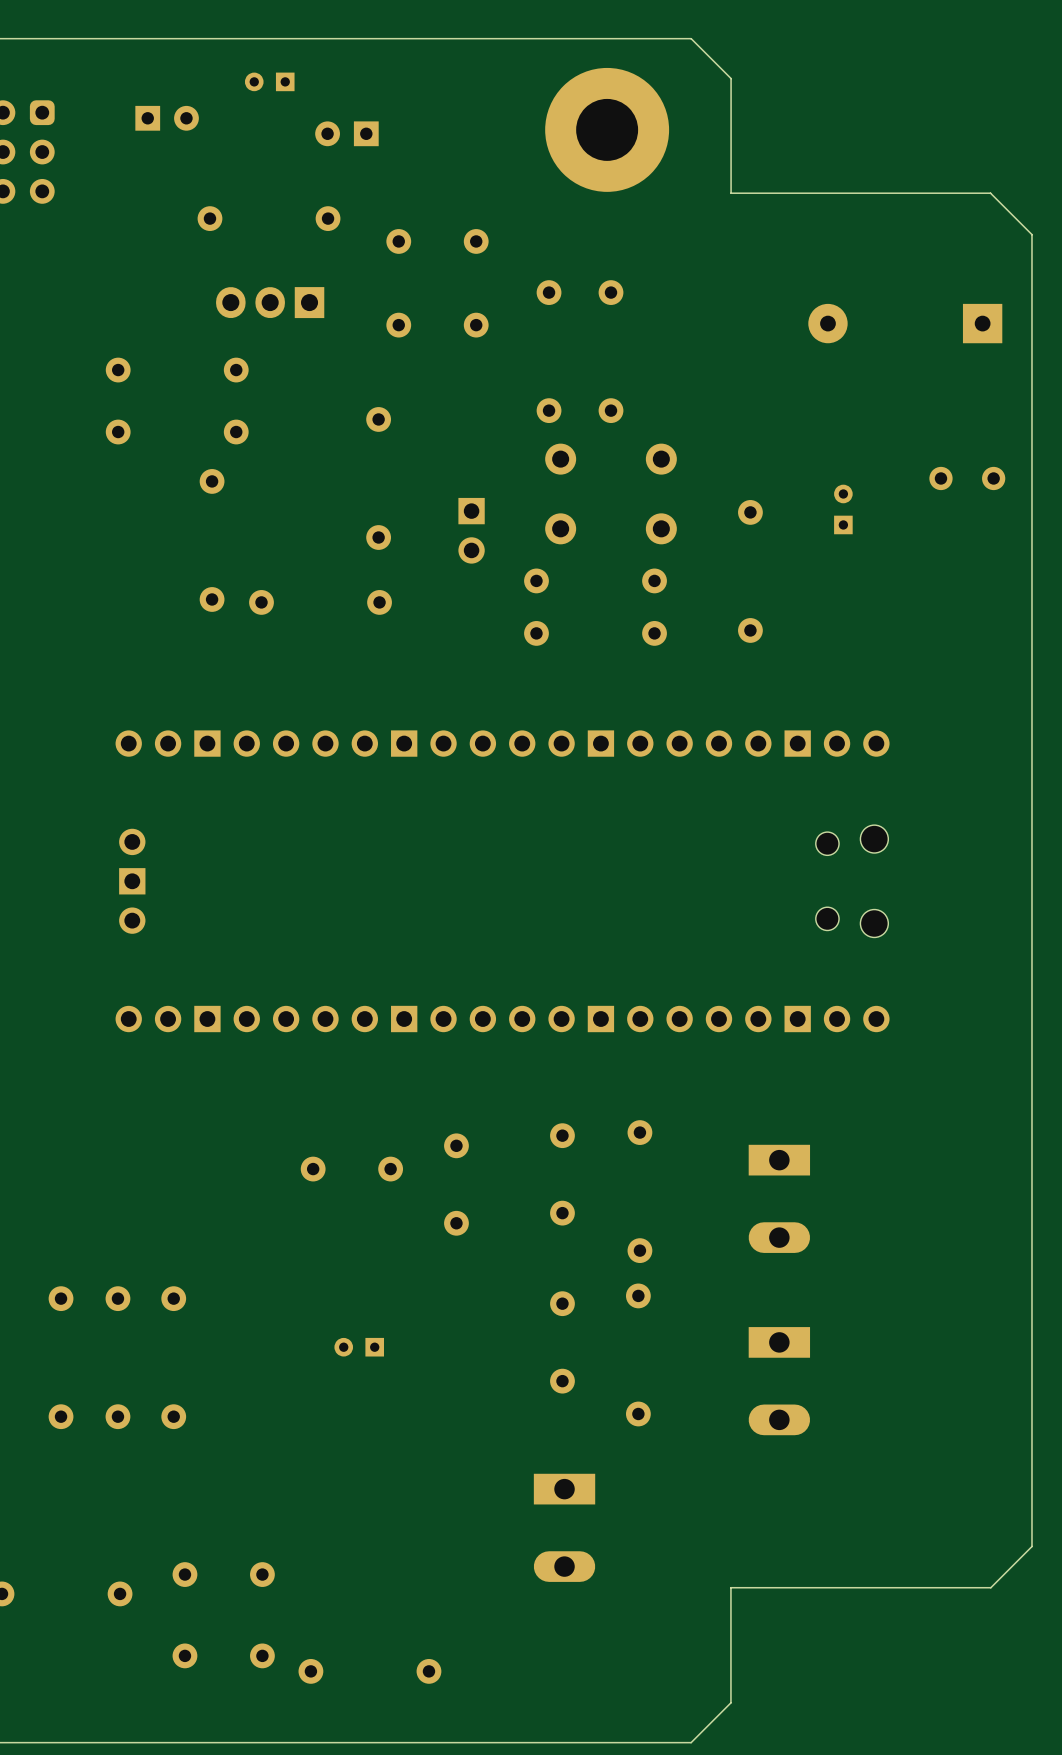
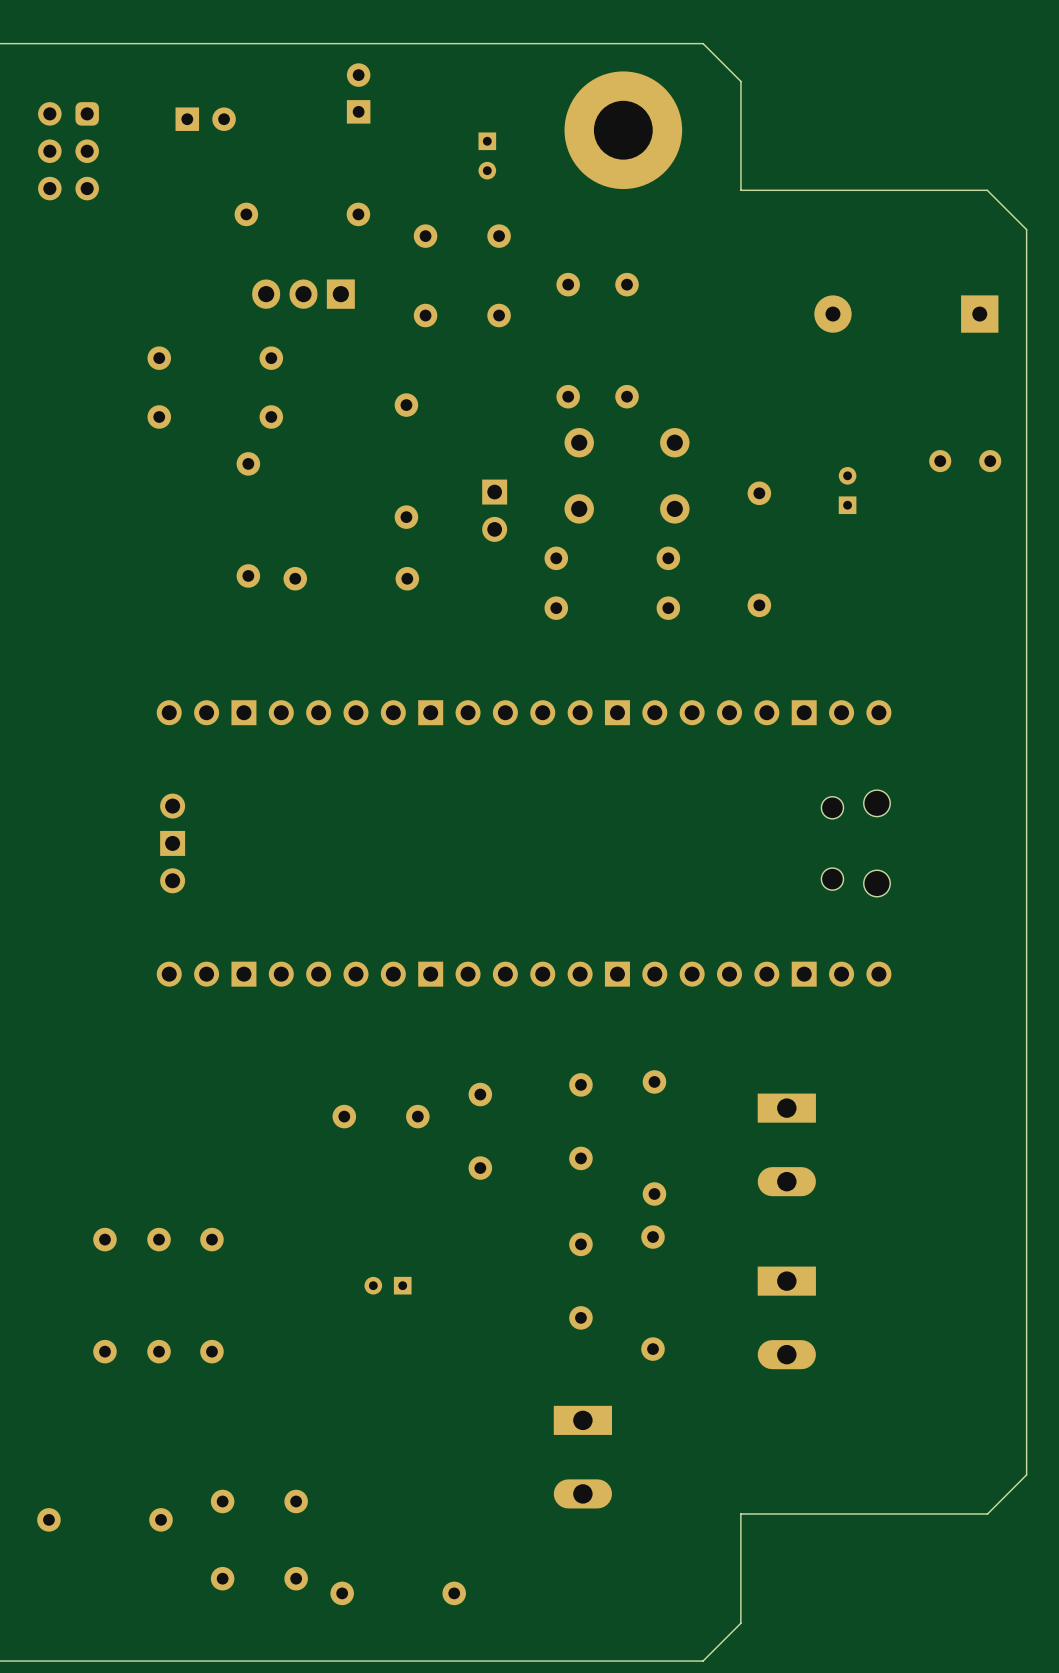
part rotation: 0° (269, 81) -> 90° counterclockwise (487, 155)
part position: (269, 81) -> (487, 155)
part rotation: 0° (346, 133) -> 90° clockwise (358, 93)
part position: (346, 133) -> (358, 93)

